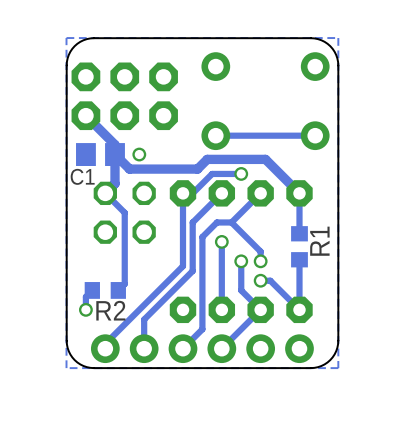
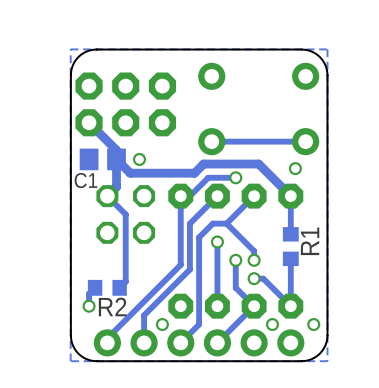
via: none -> (295, 168)
via: none -> (162, 324)
via: none -> (272, 324)
via: none -> (313, 324)

